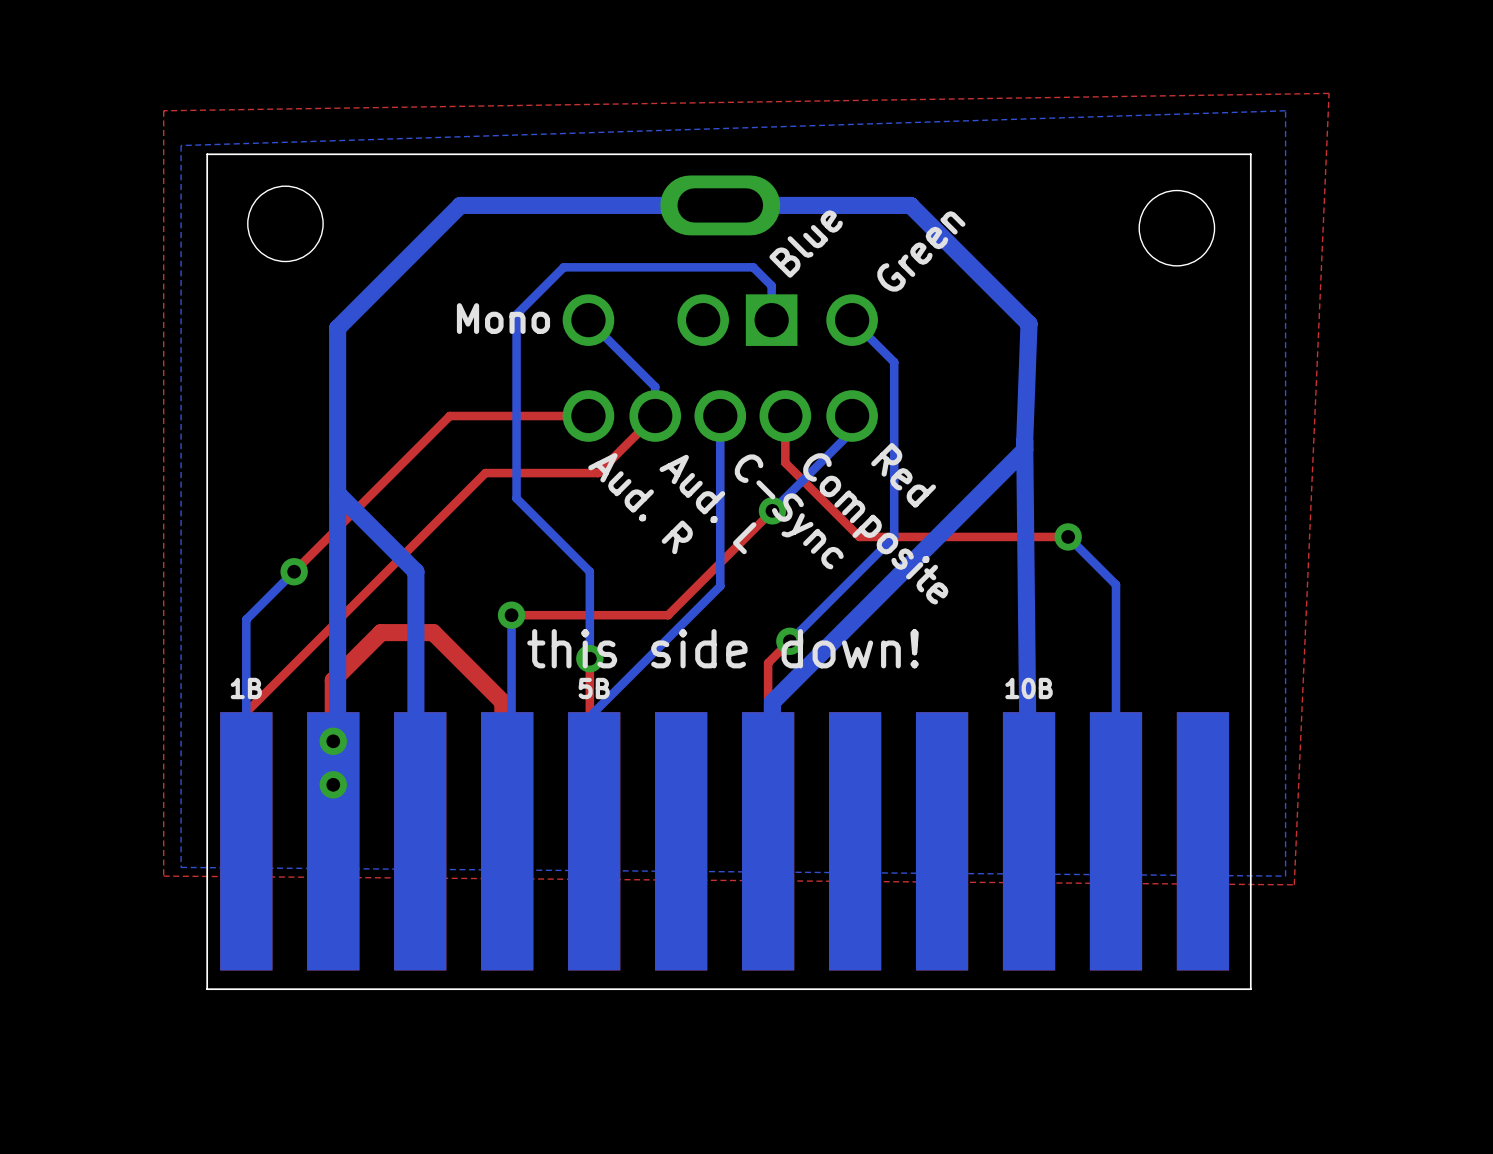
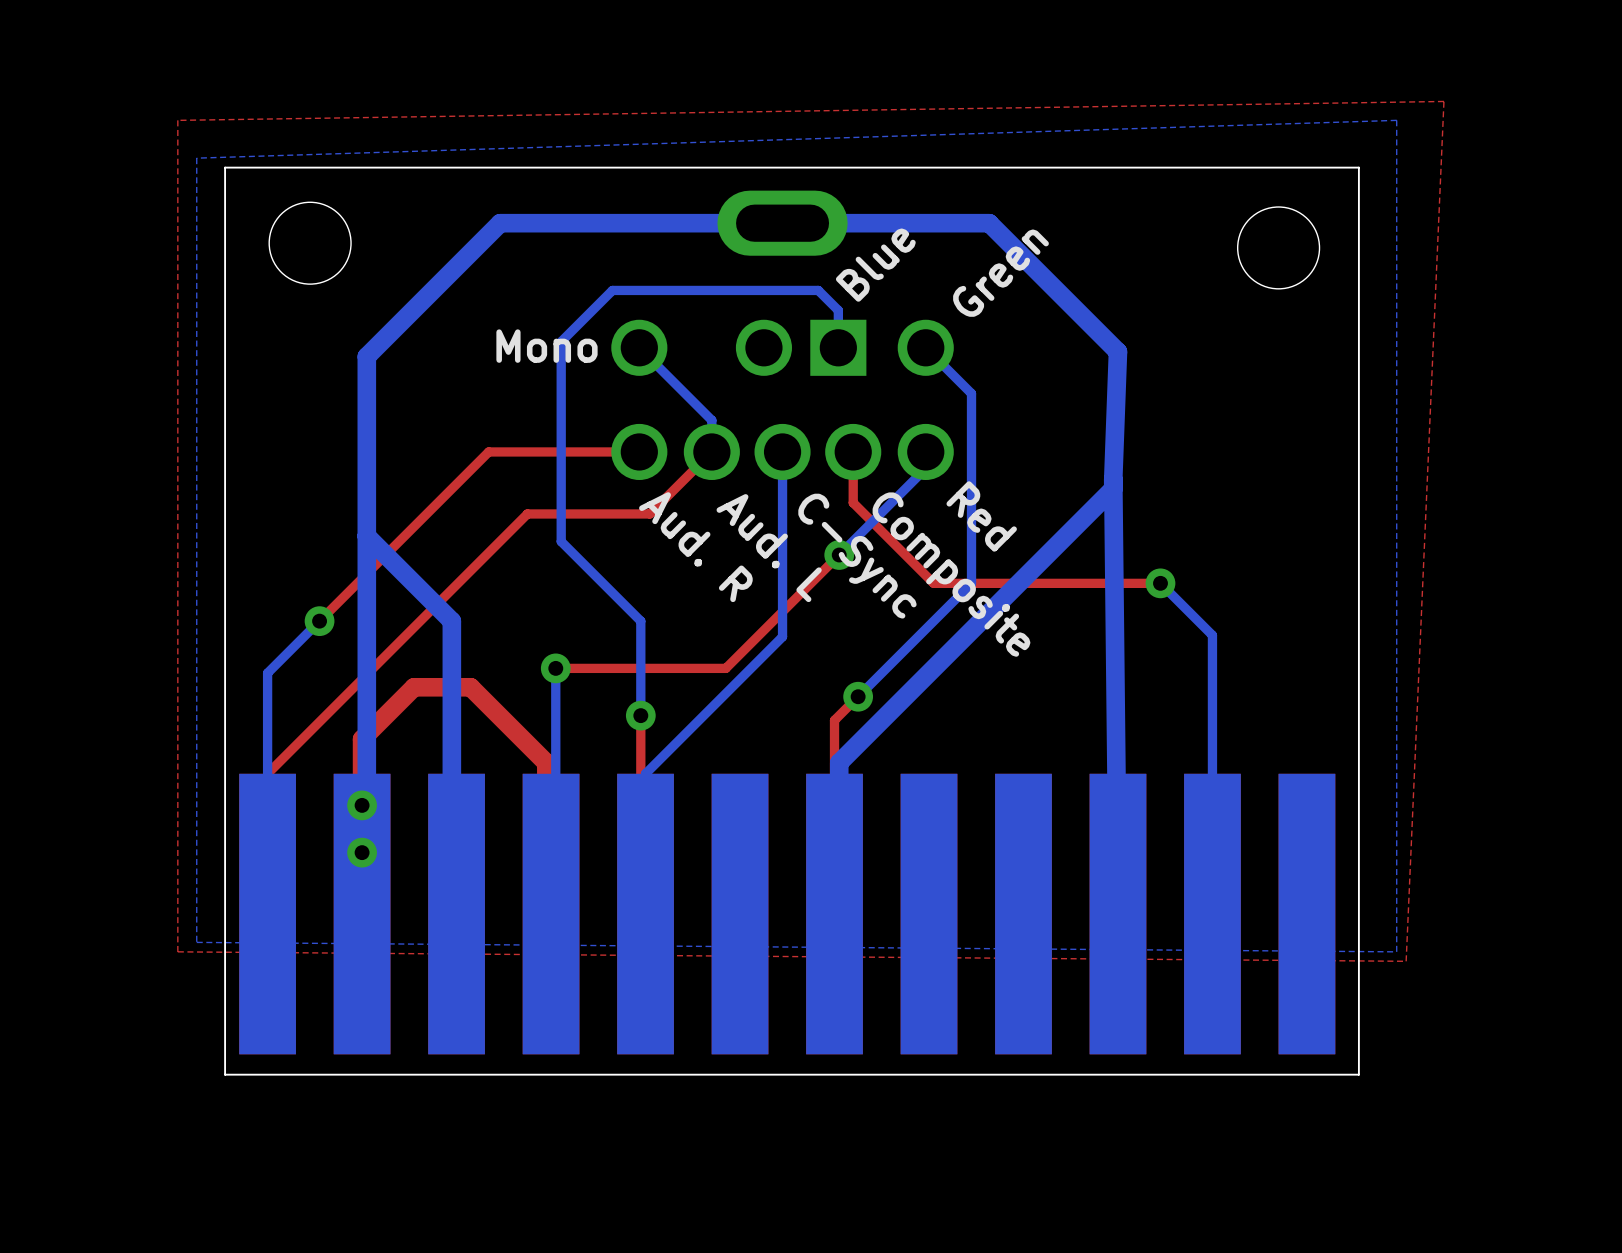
text: this side down! (723, 648) -> none
text: 1B (246, 688) -> none
text: 5B (594, 688) -> none
text: 10B (1029, 688) -> none

